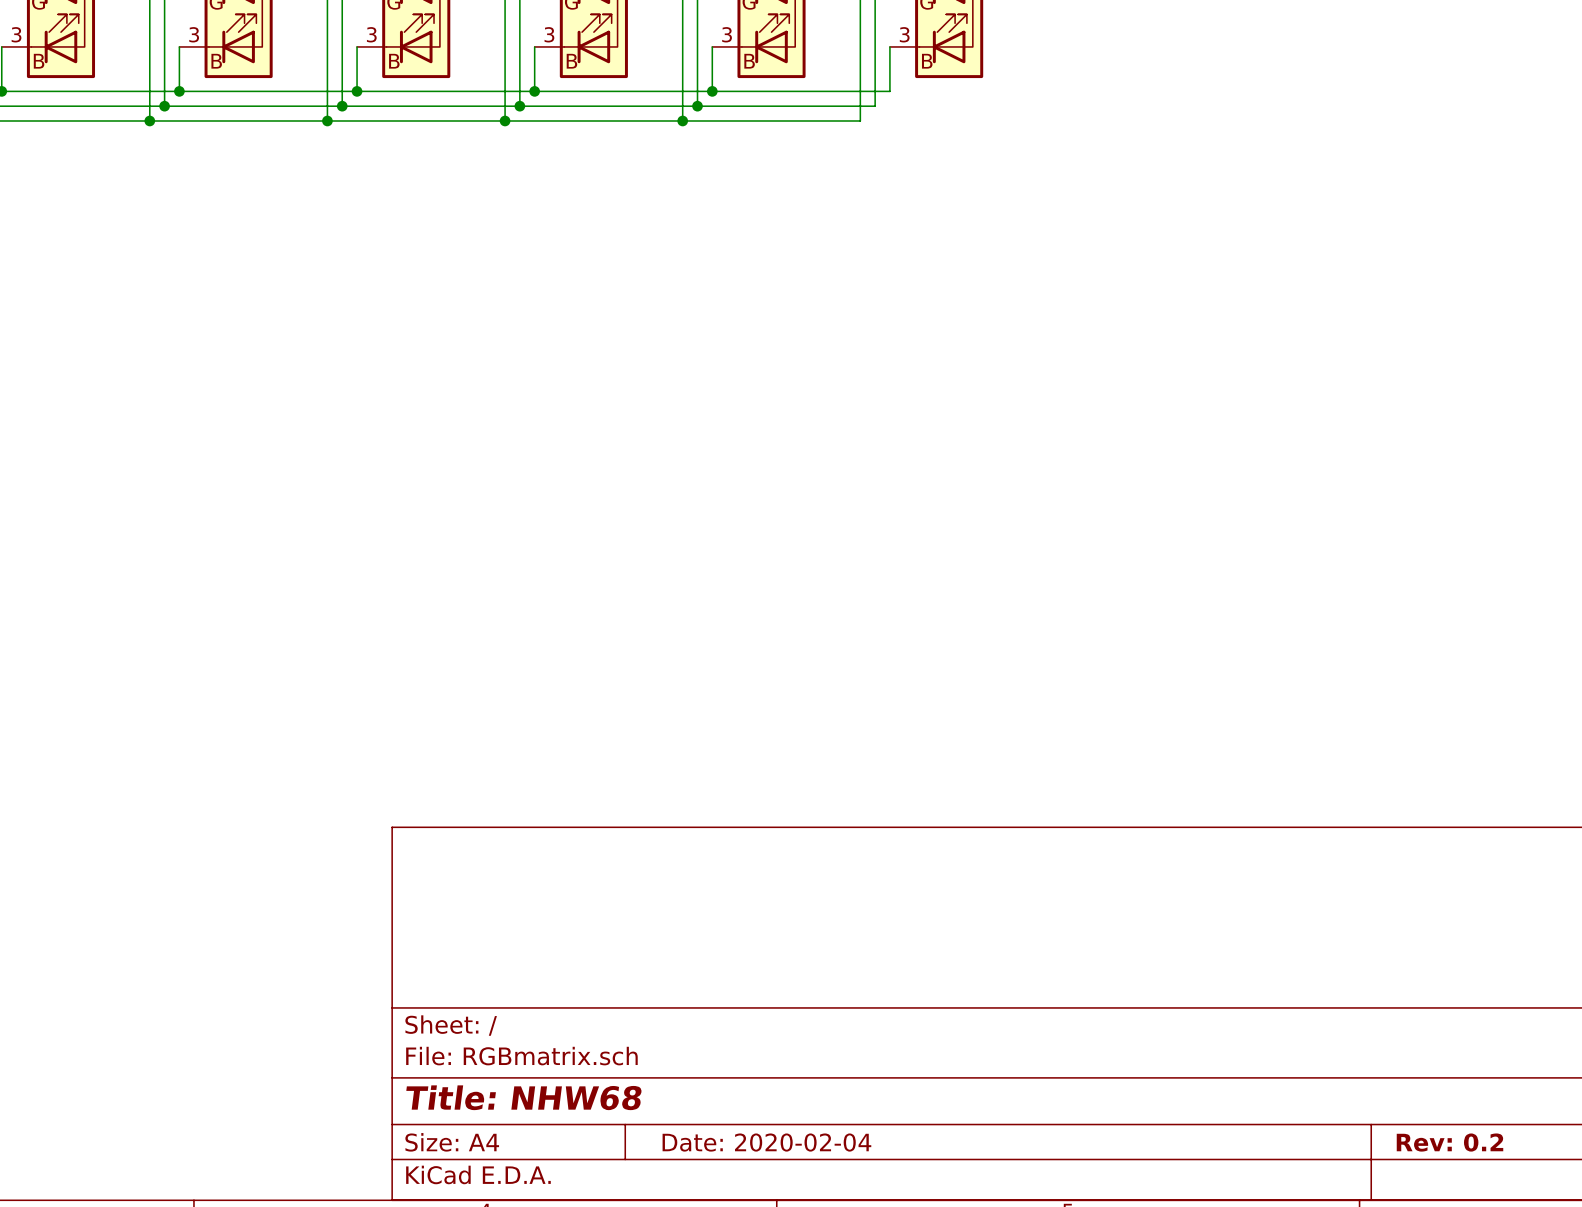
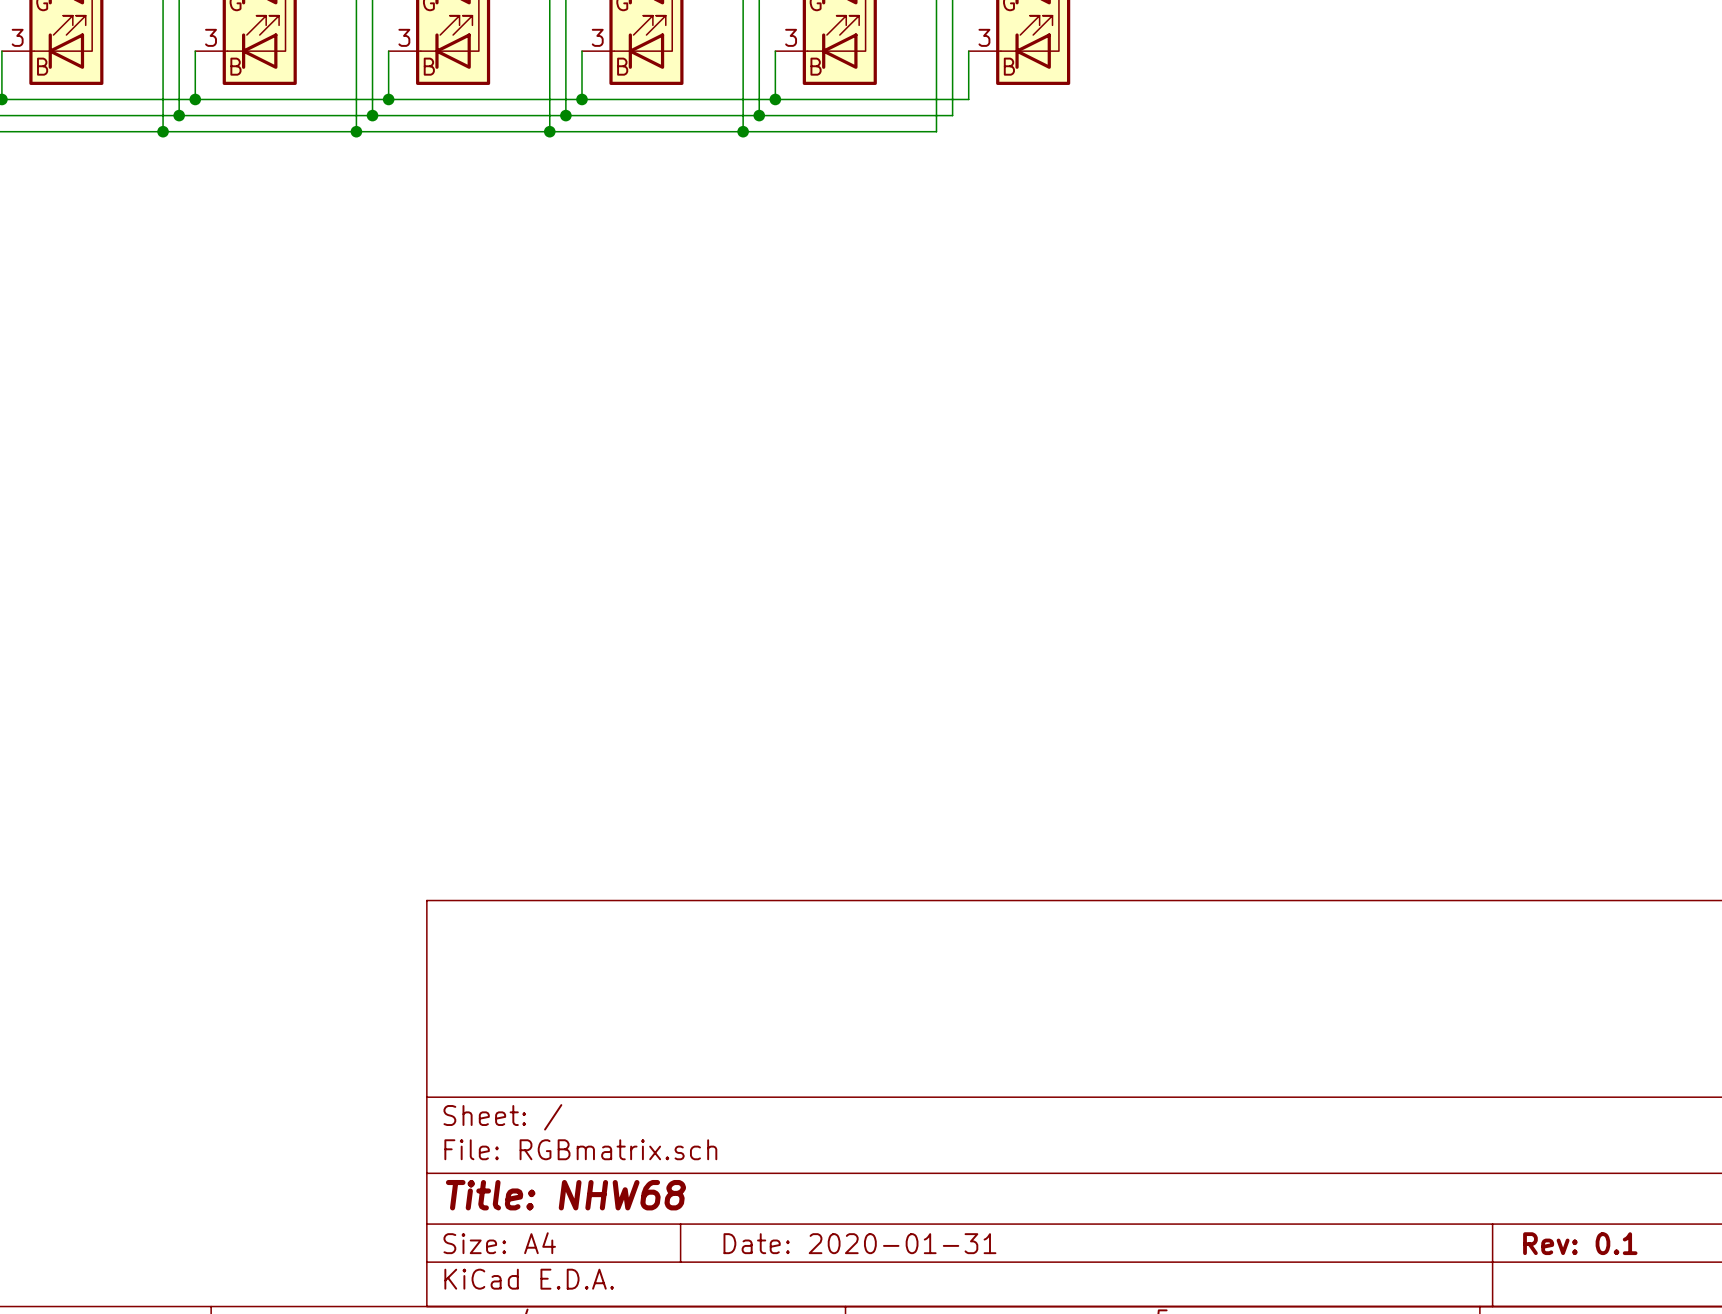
title block: Date: 2020-02-04 (766, 1142) -> Date: 2020-01-31 (859, 1243)
title block: Rev: 0.2 (1450, 1142) -> Rev: 0.1 (1580, 1243)

